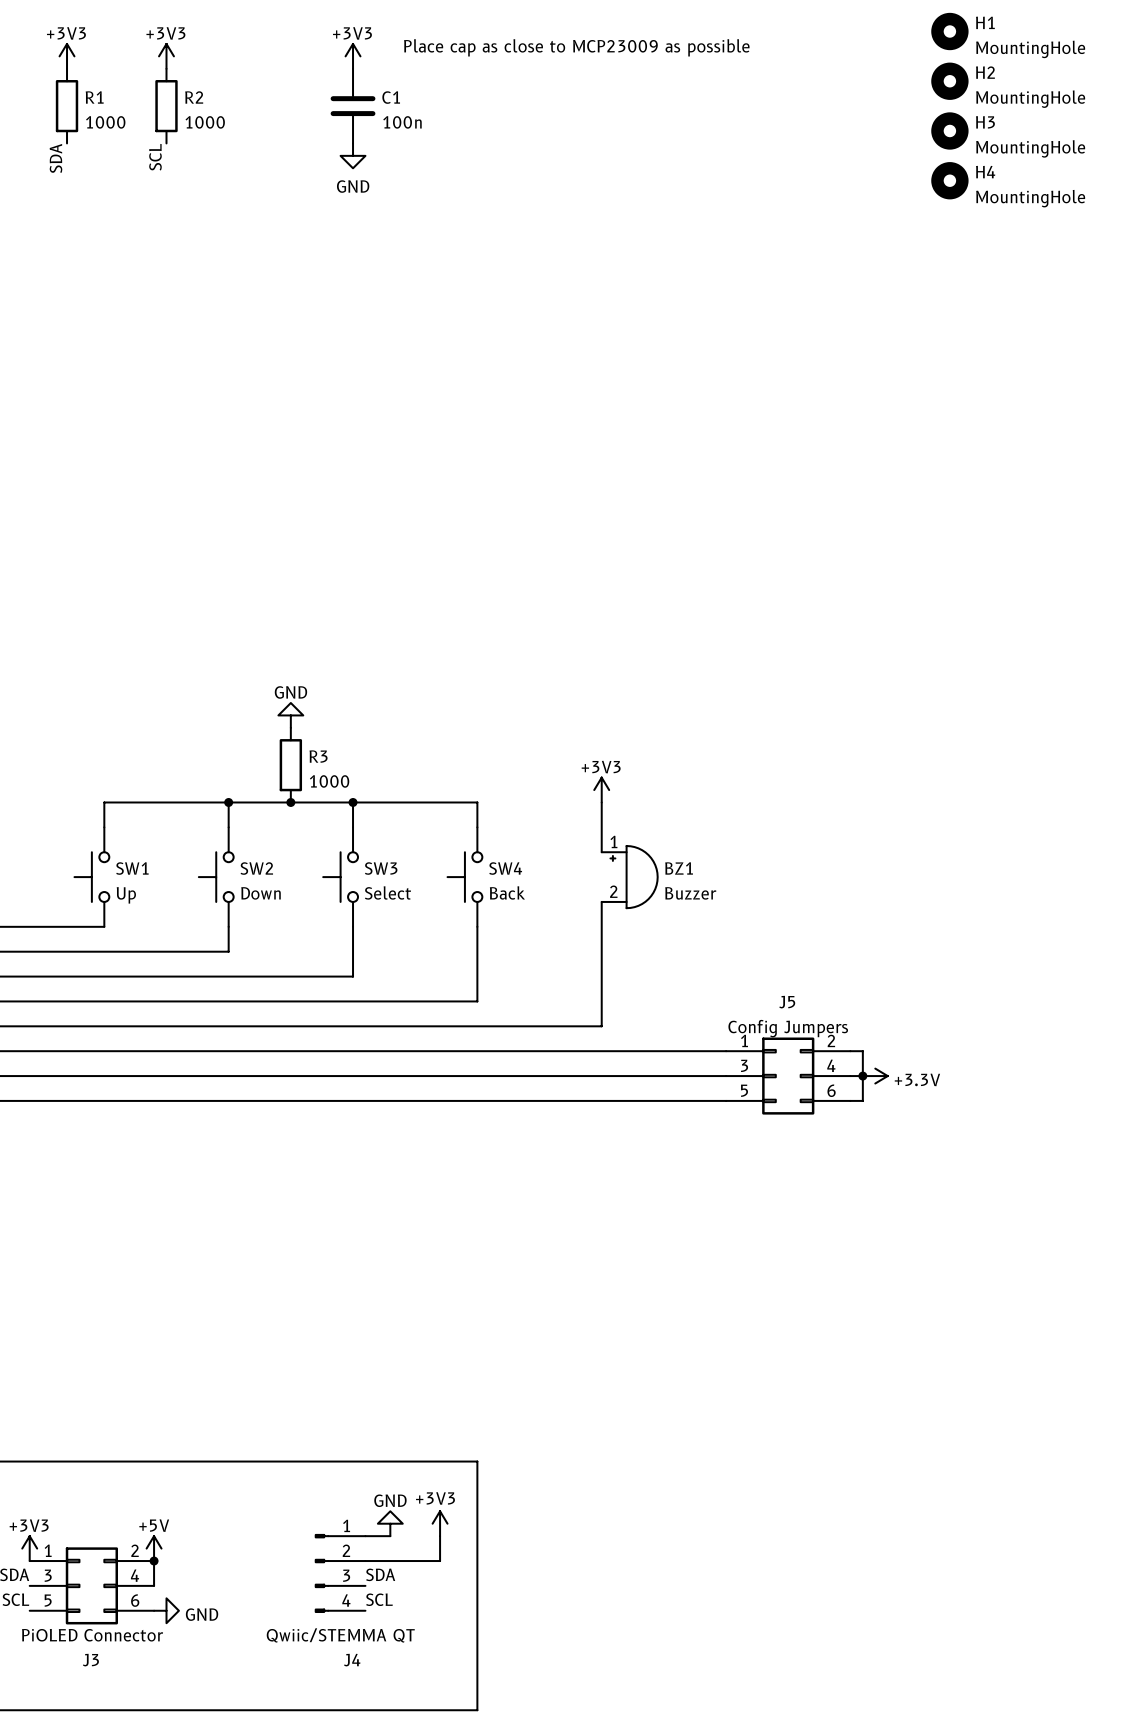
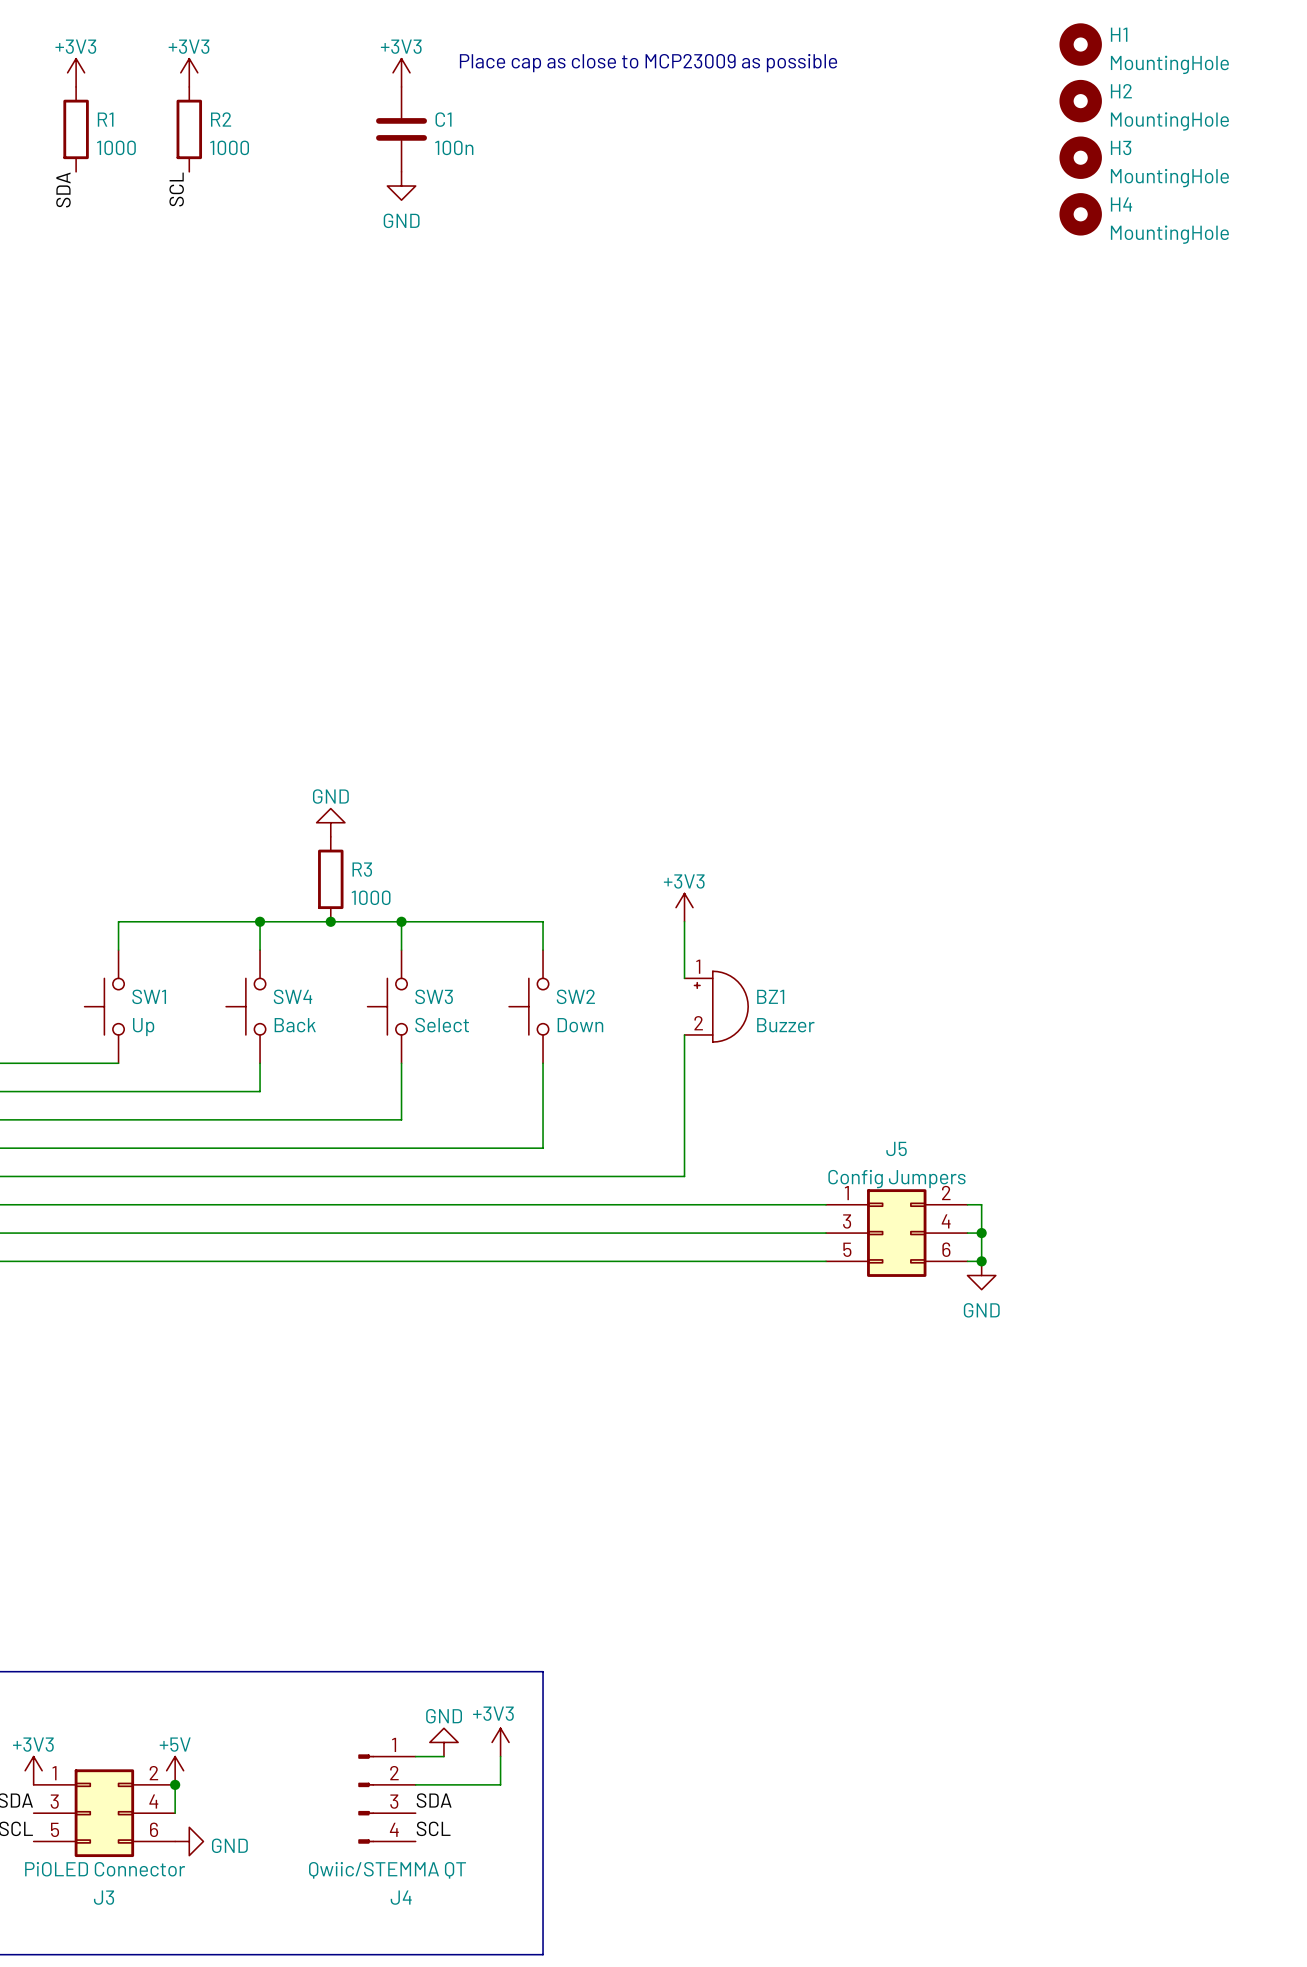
SW2 name: SW2 (256, 868) -> SW4 (293, 996)
SW4 name: SW4 (505, 868) -> SW2 (575, 996)
SW4 value: Back (507, 892) -> Down (580, 1025)
SW2 value: Down (261, 893) -> Back (295, 1025)
power symbol: +3.3V (875, 1076) -> none
junction: none -> (981, 1261)
power symbol: none -> GND (981, 1275)

